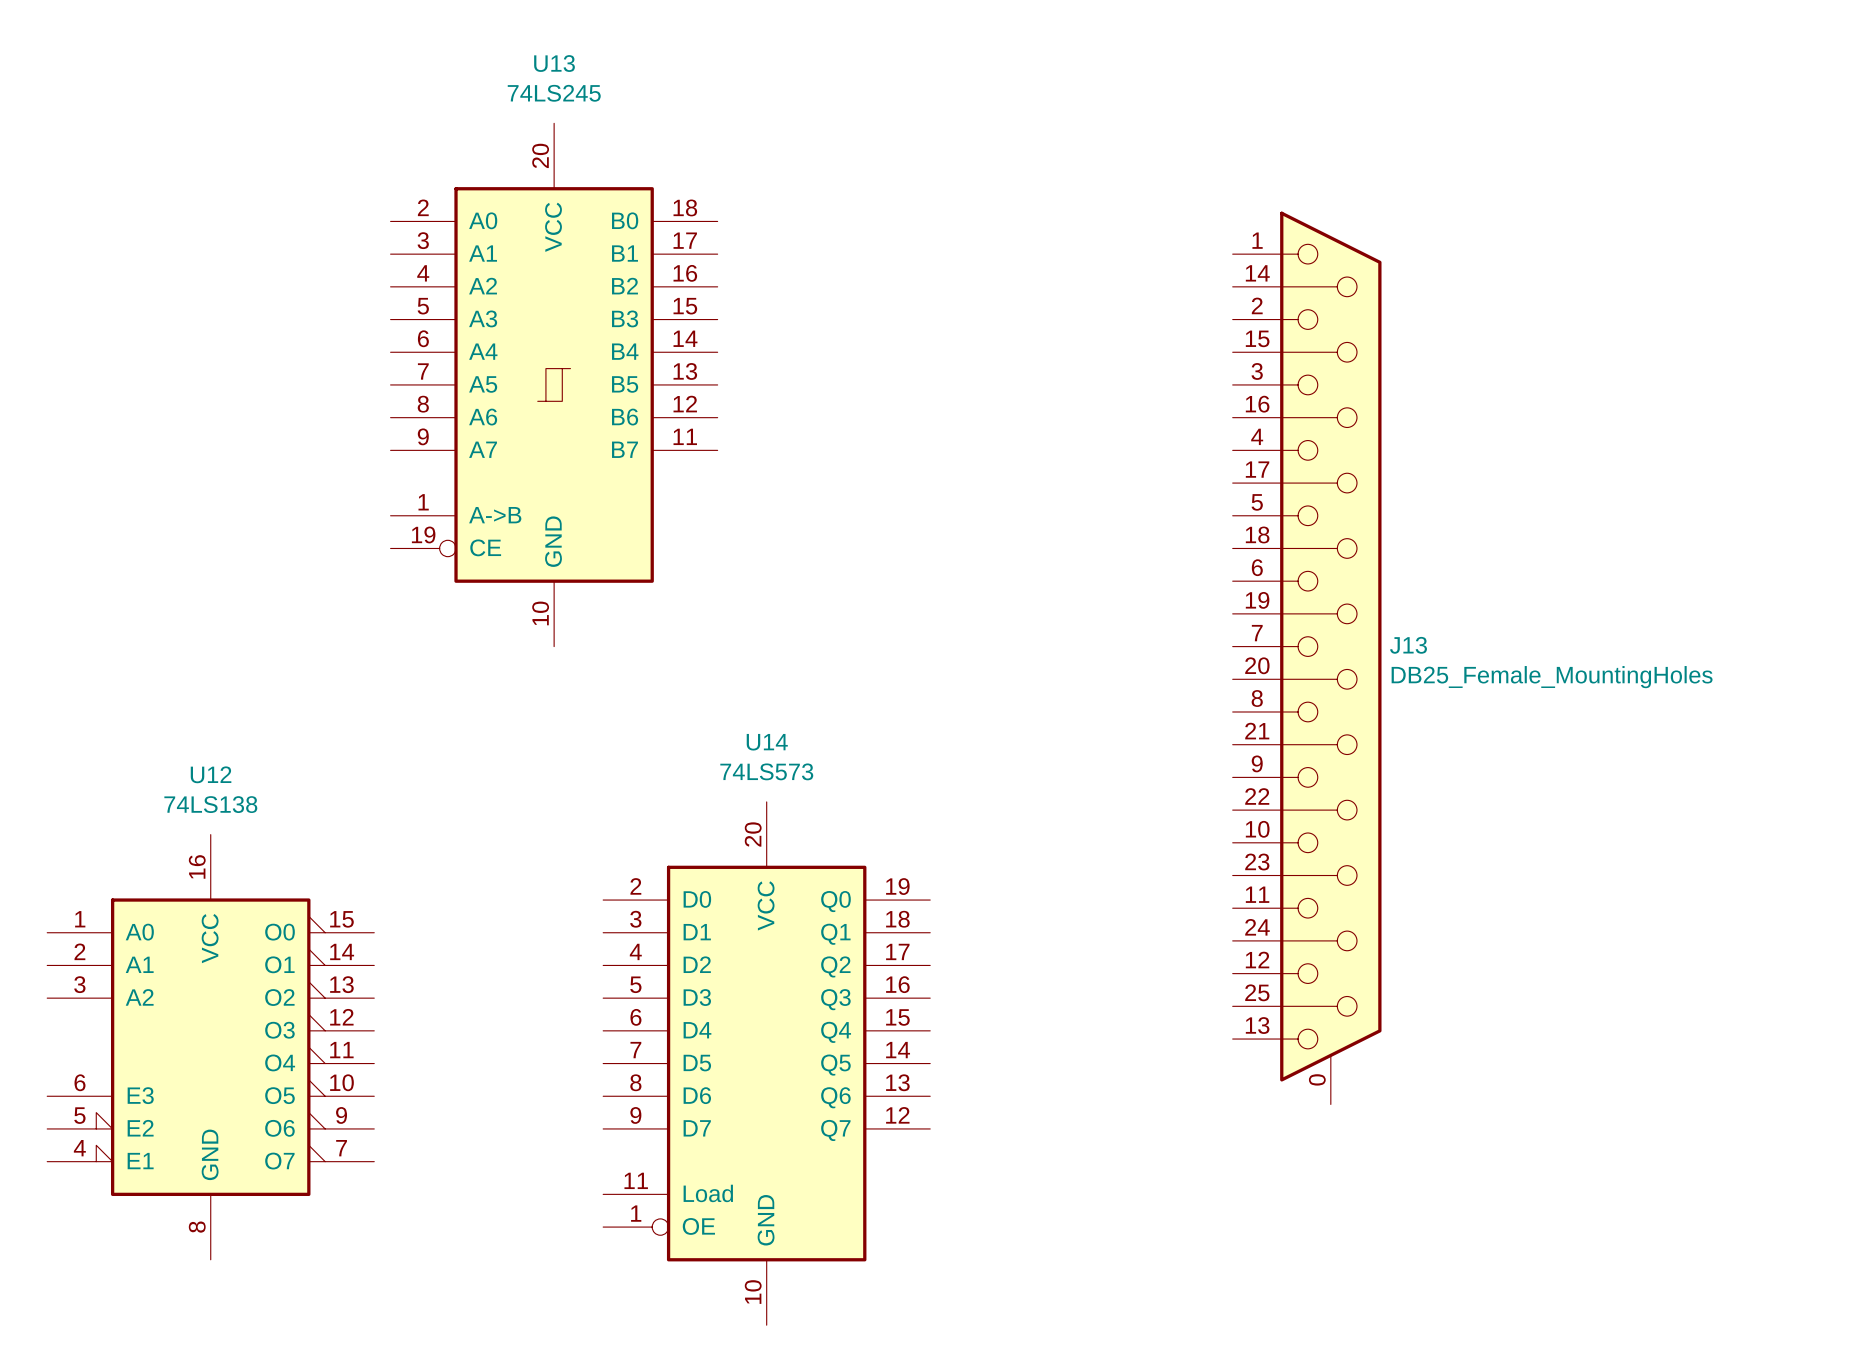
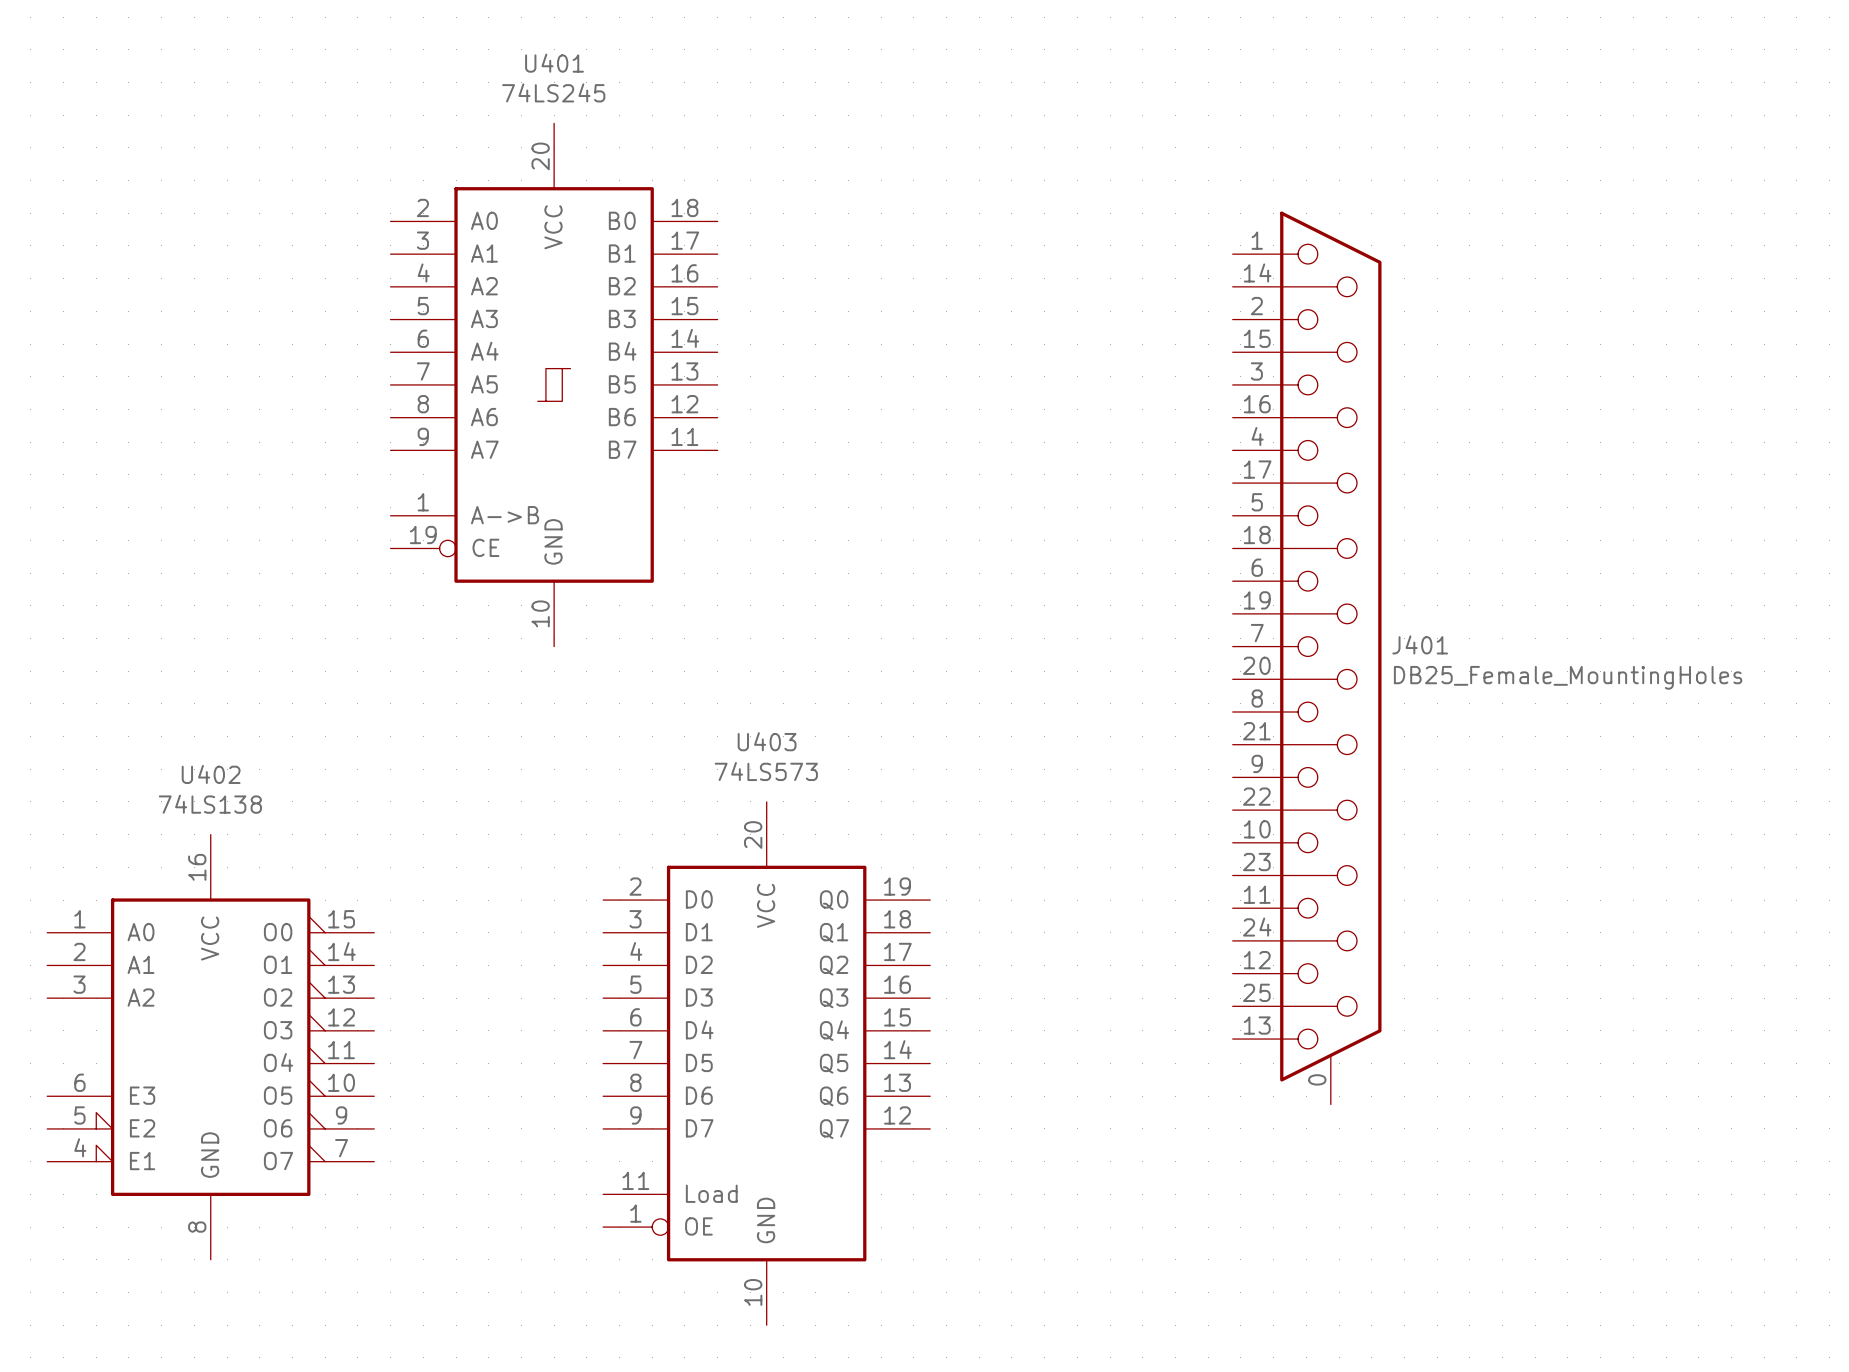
U13 name: U13 (554, 63) -> U401 (554, 63)
J13 name: J13 (1408, 645) -> J401 (1420, 644)
U14 name: U14 (767, 742) -> U403 (767, 741)
U12 name: U12 (211, 774) -> U402 (211, 774)

